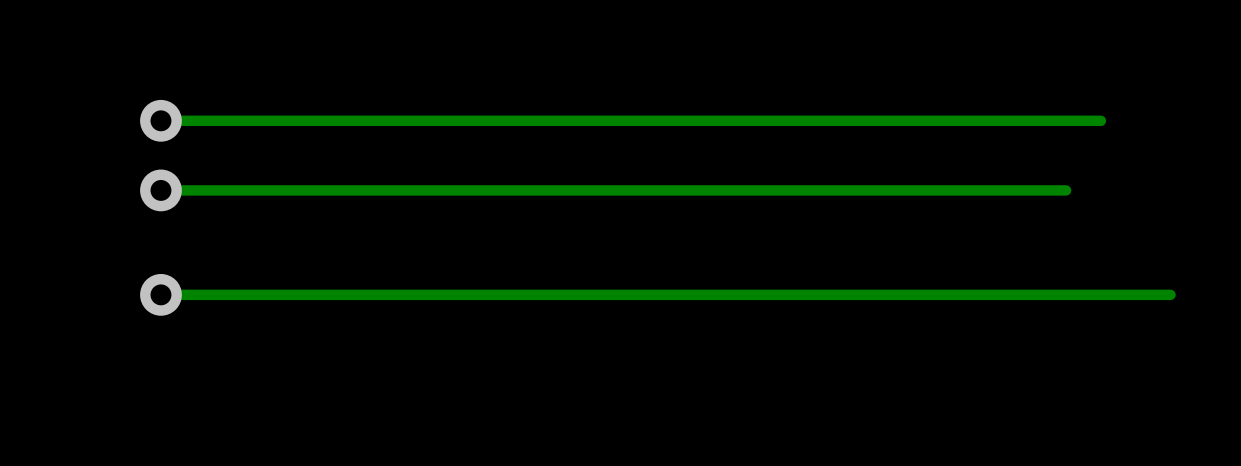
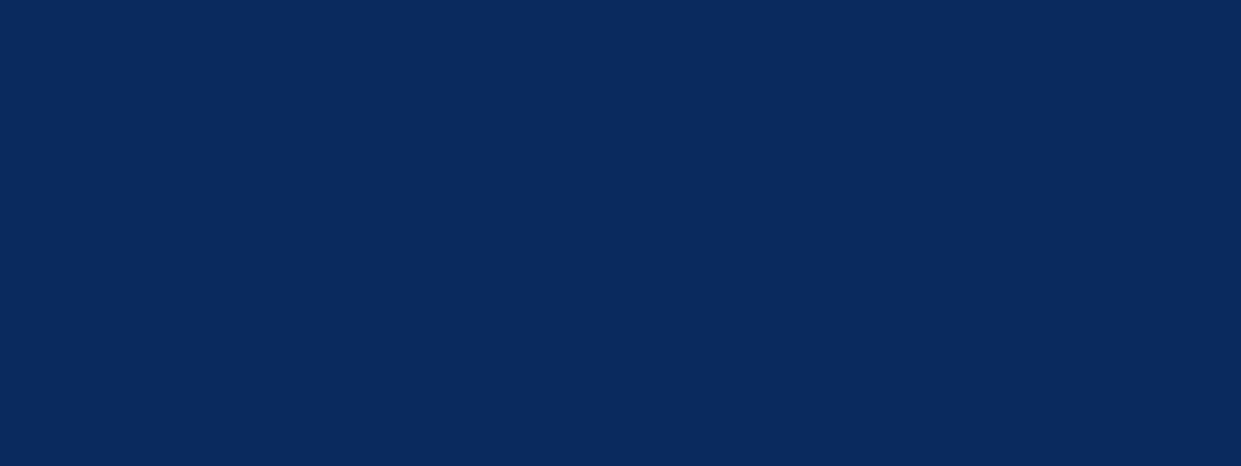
via: (160, 120) -> none
track: (1100, 120) (160, 120) -> none
via: (160, 190) -> none
track: (1066, 190) (160, 190) -> none
via: (160, 294) -> none
track: (1170, 294) (160, 294) -> none

